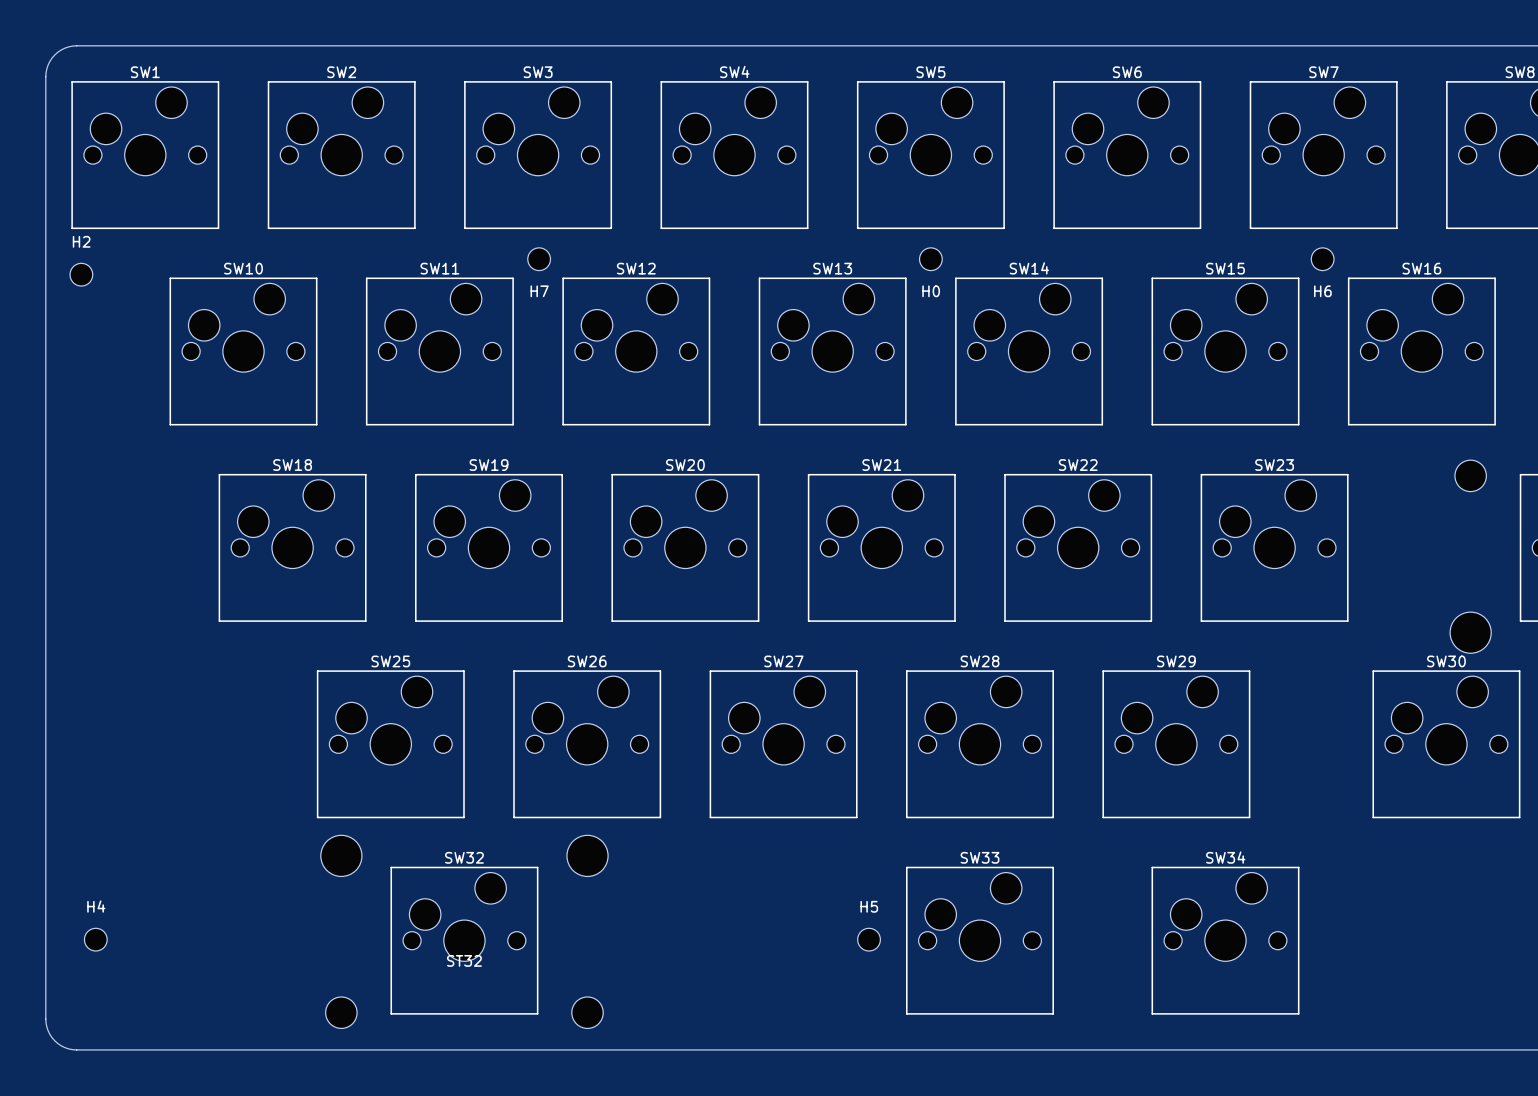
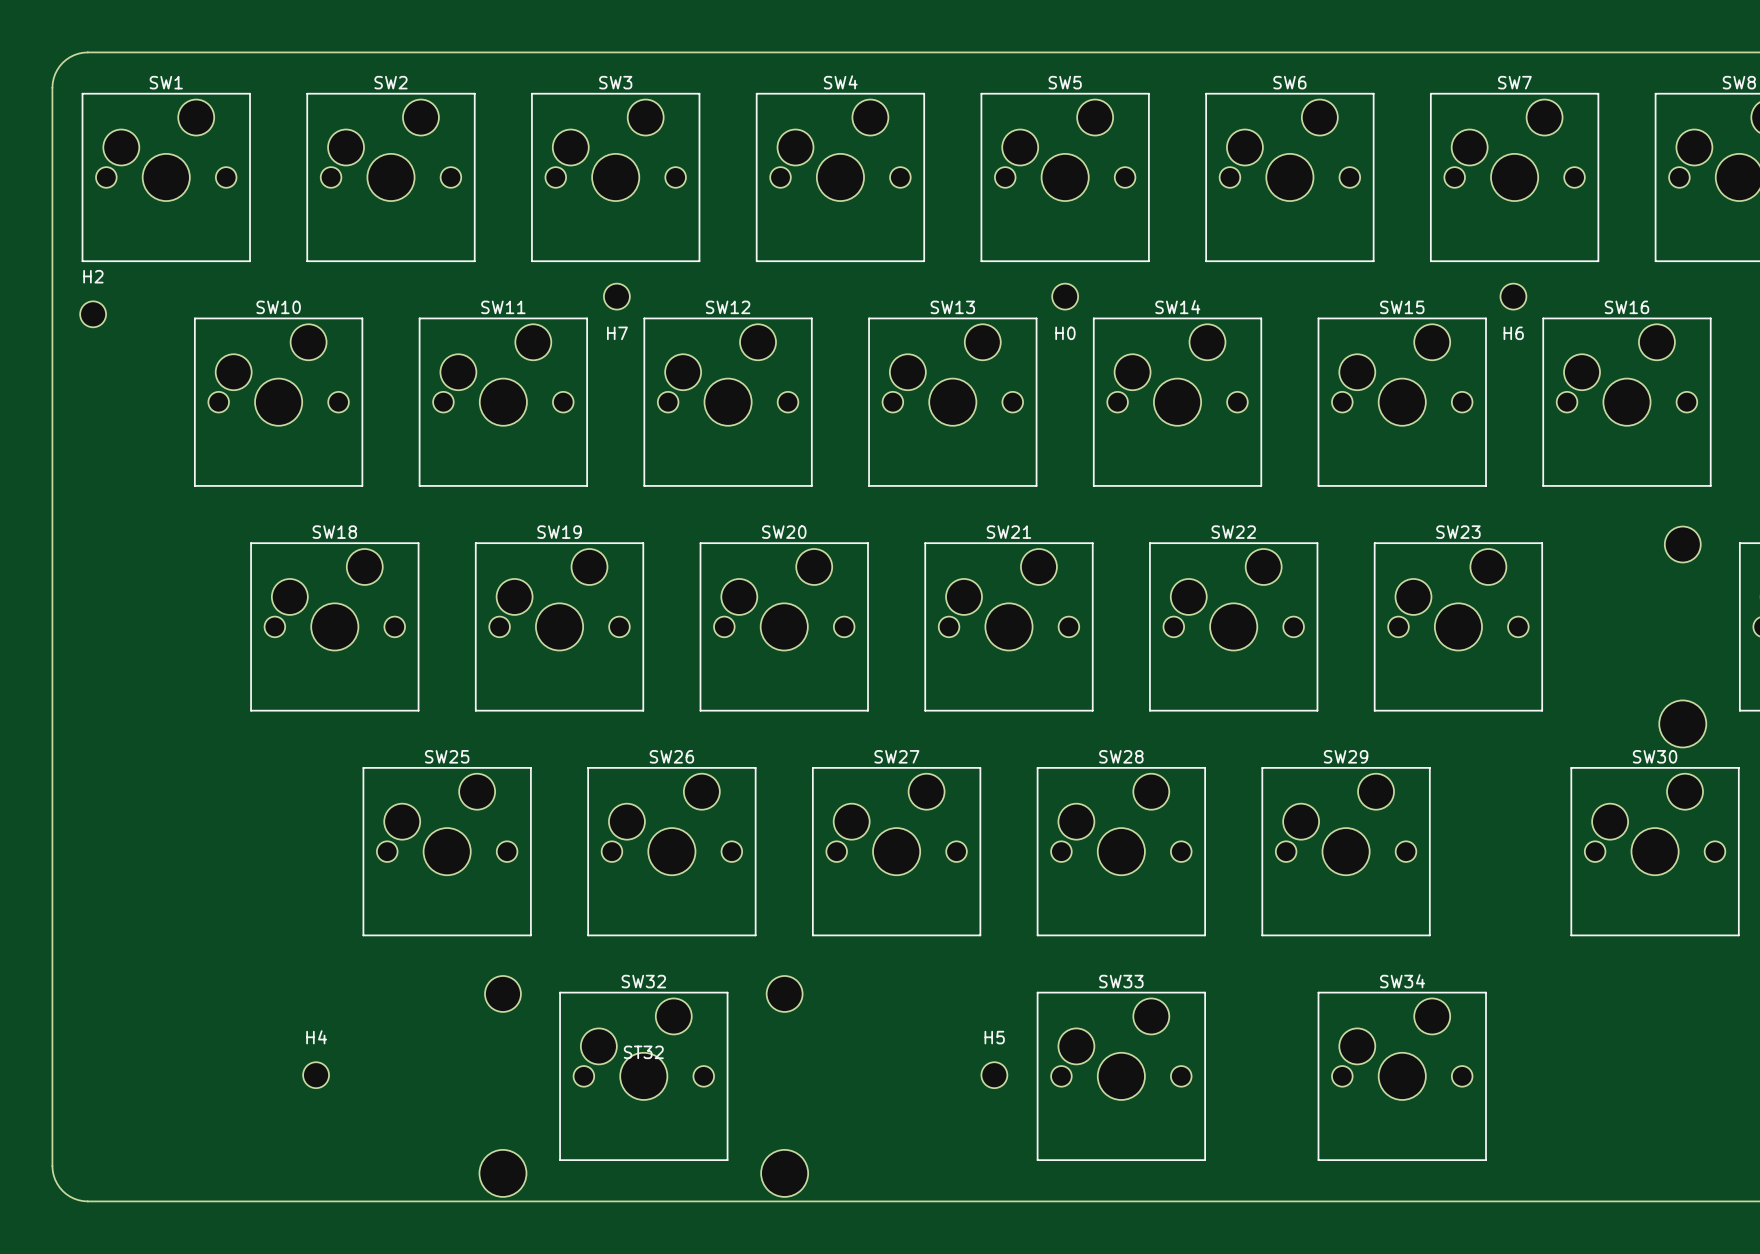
ST32 rotation: 0° (464, 931) -> 180° (643, 1086)
H4 position: (95, 939) -> (316, 1075)
SW32 position: (464, 940) -> (643, 1076)

